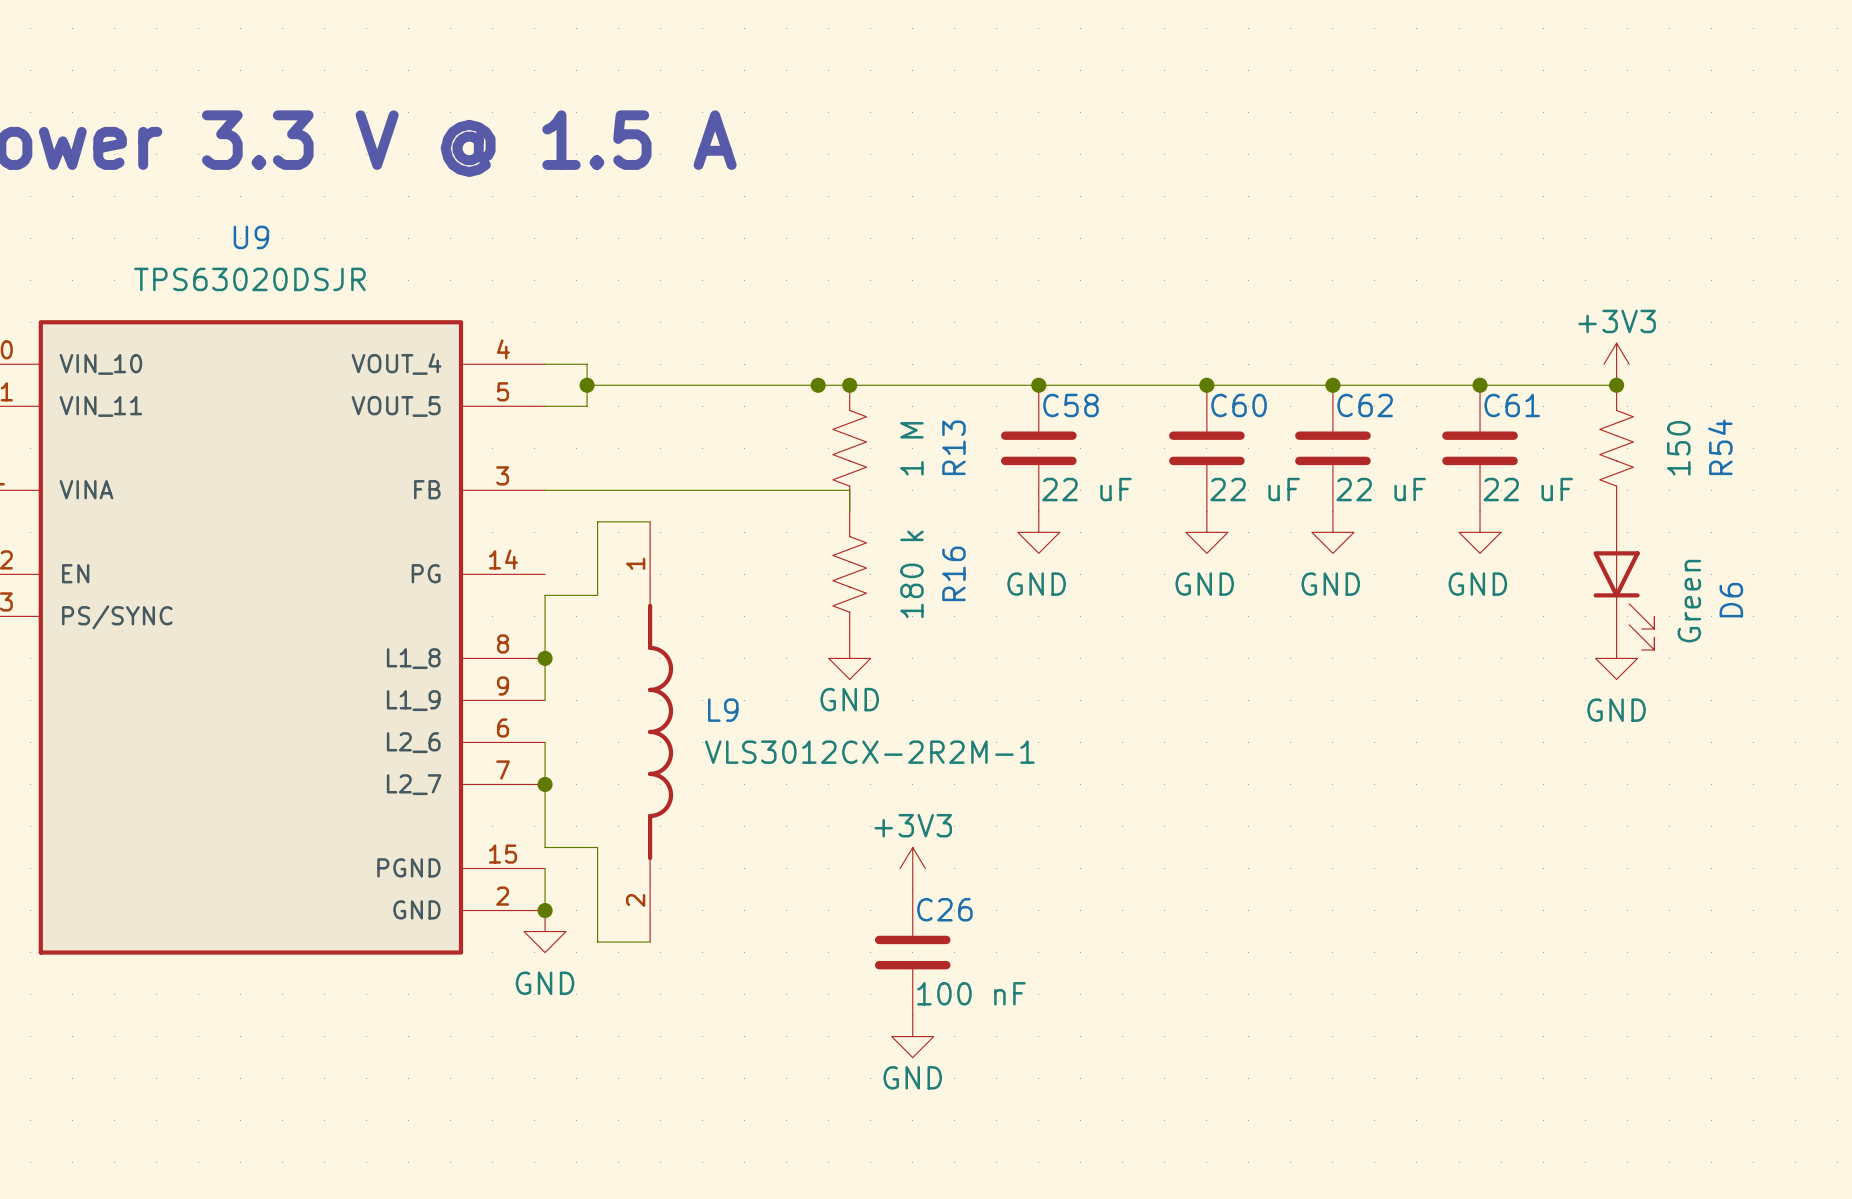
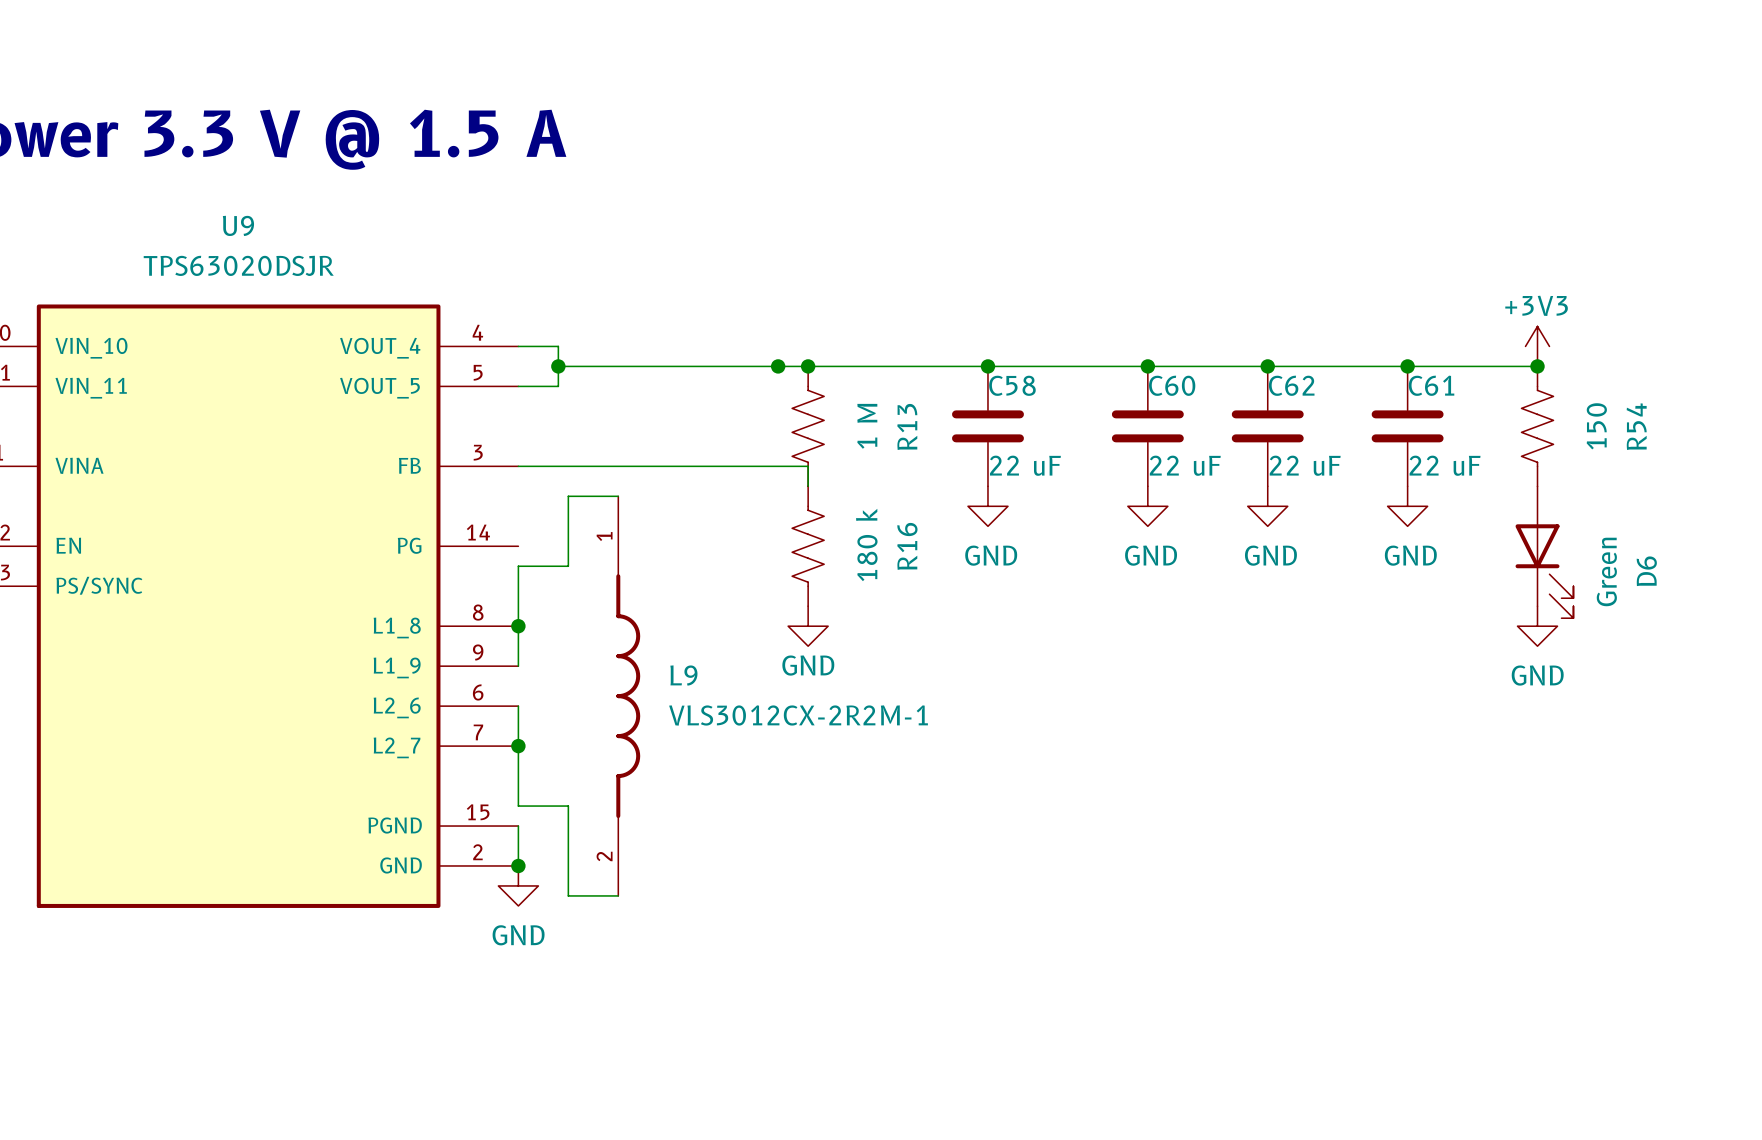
power symbol: +3V3 (912, 868) -> none
C26: 100 nF (912, 952) -> none
power symbol: GND (912, 1036) -> none

